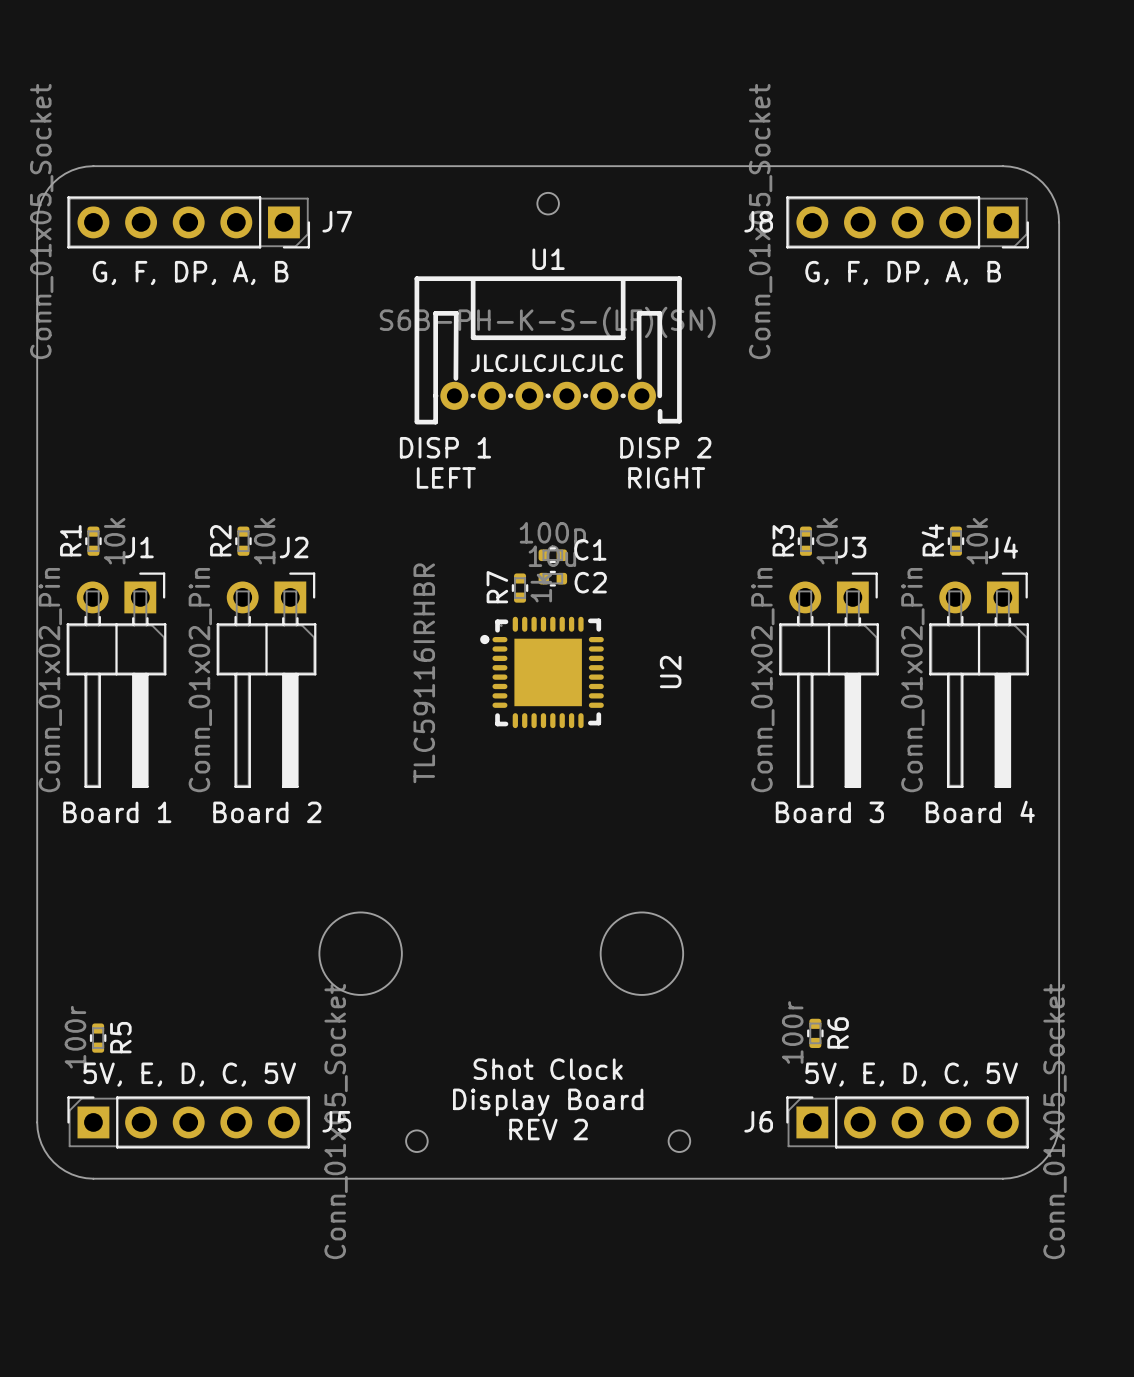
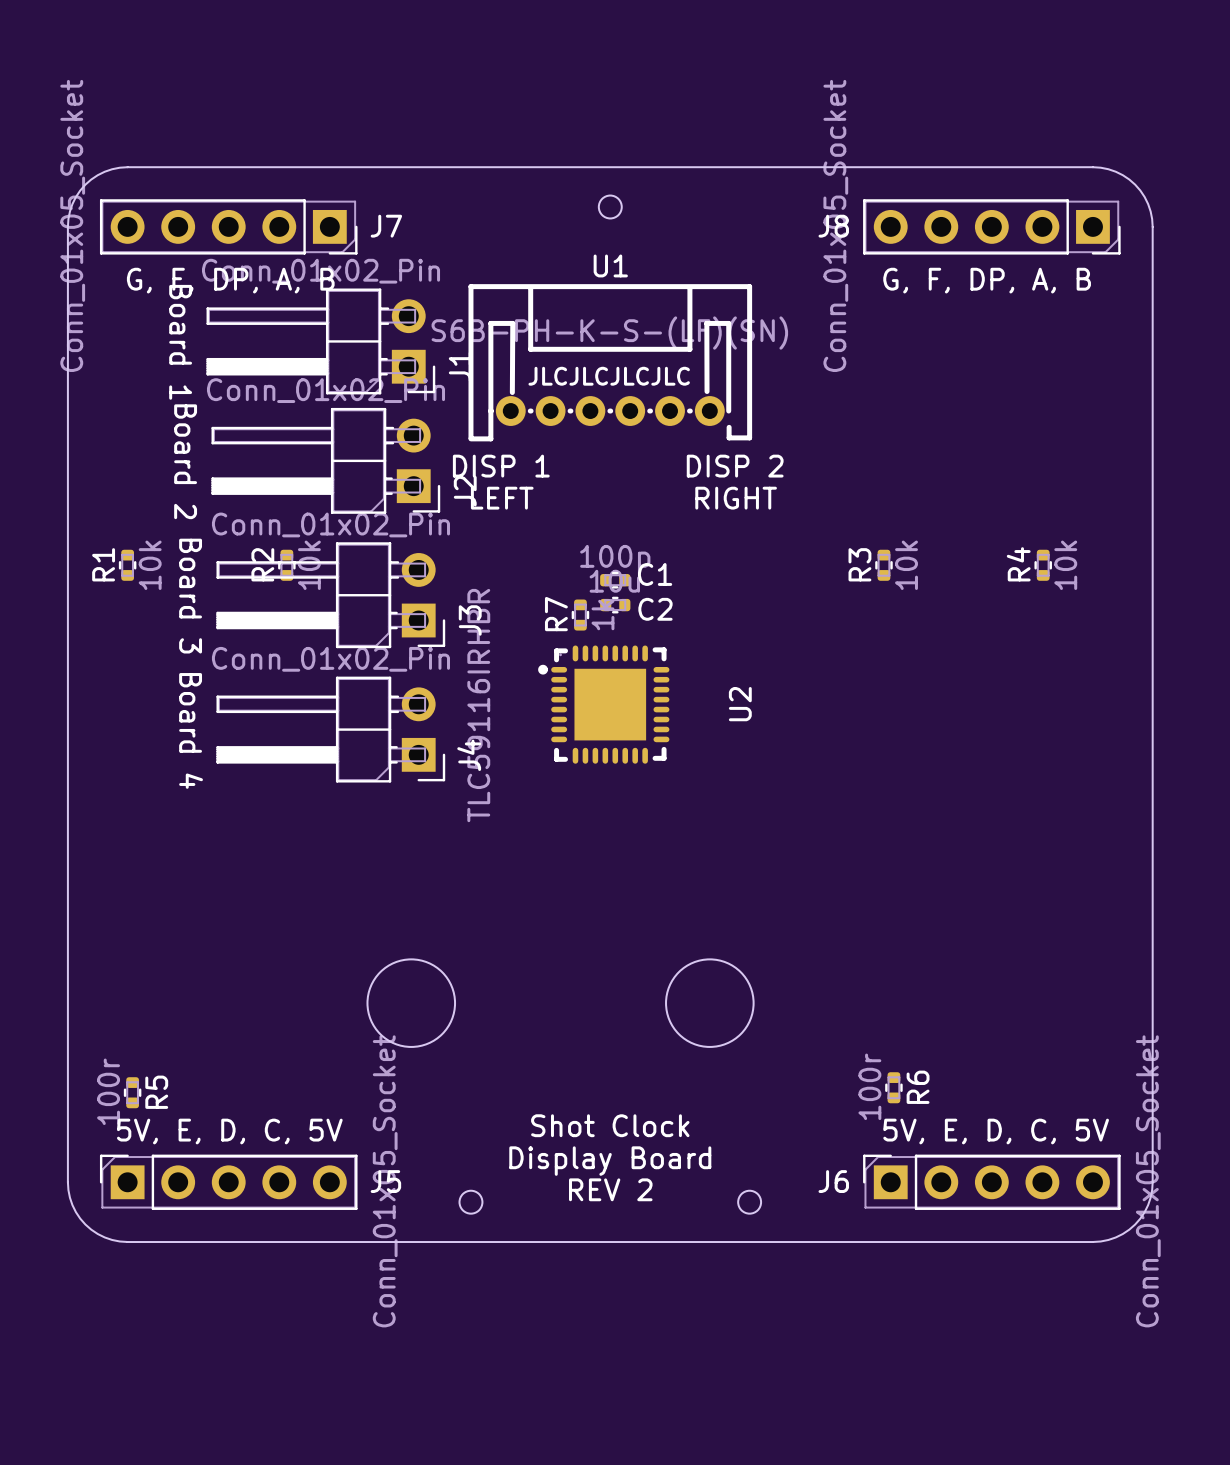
J1 rotation: 0° (116, 680) -> 90° clockwise (320, 341)
J1 position: (116, 680) -> (320, 341)
J2 rotation: 0° (266, 680) -> 90° clockwise (325, 460)
J2 position: (266, 680) -> (325, 460)
J3 rotation: 0° (829, 680) -> 90° clockwise (330, 595)
J3 position: (829, 680) -> (330, 595)
J4 rotation: 0° (979, 680) -> 90° clockwise (330, 729)
J4 position: (979, 680) -> (330, 729)

